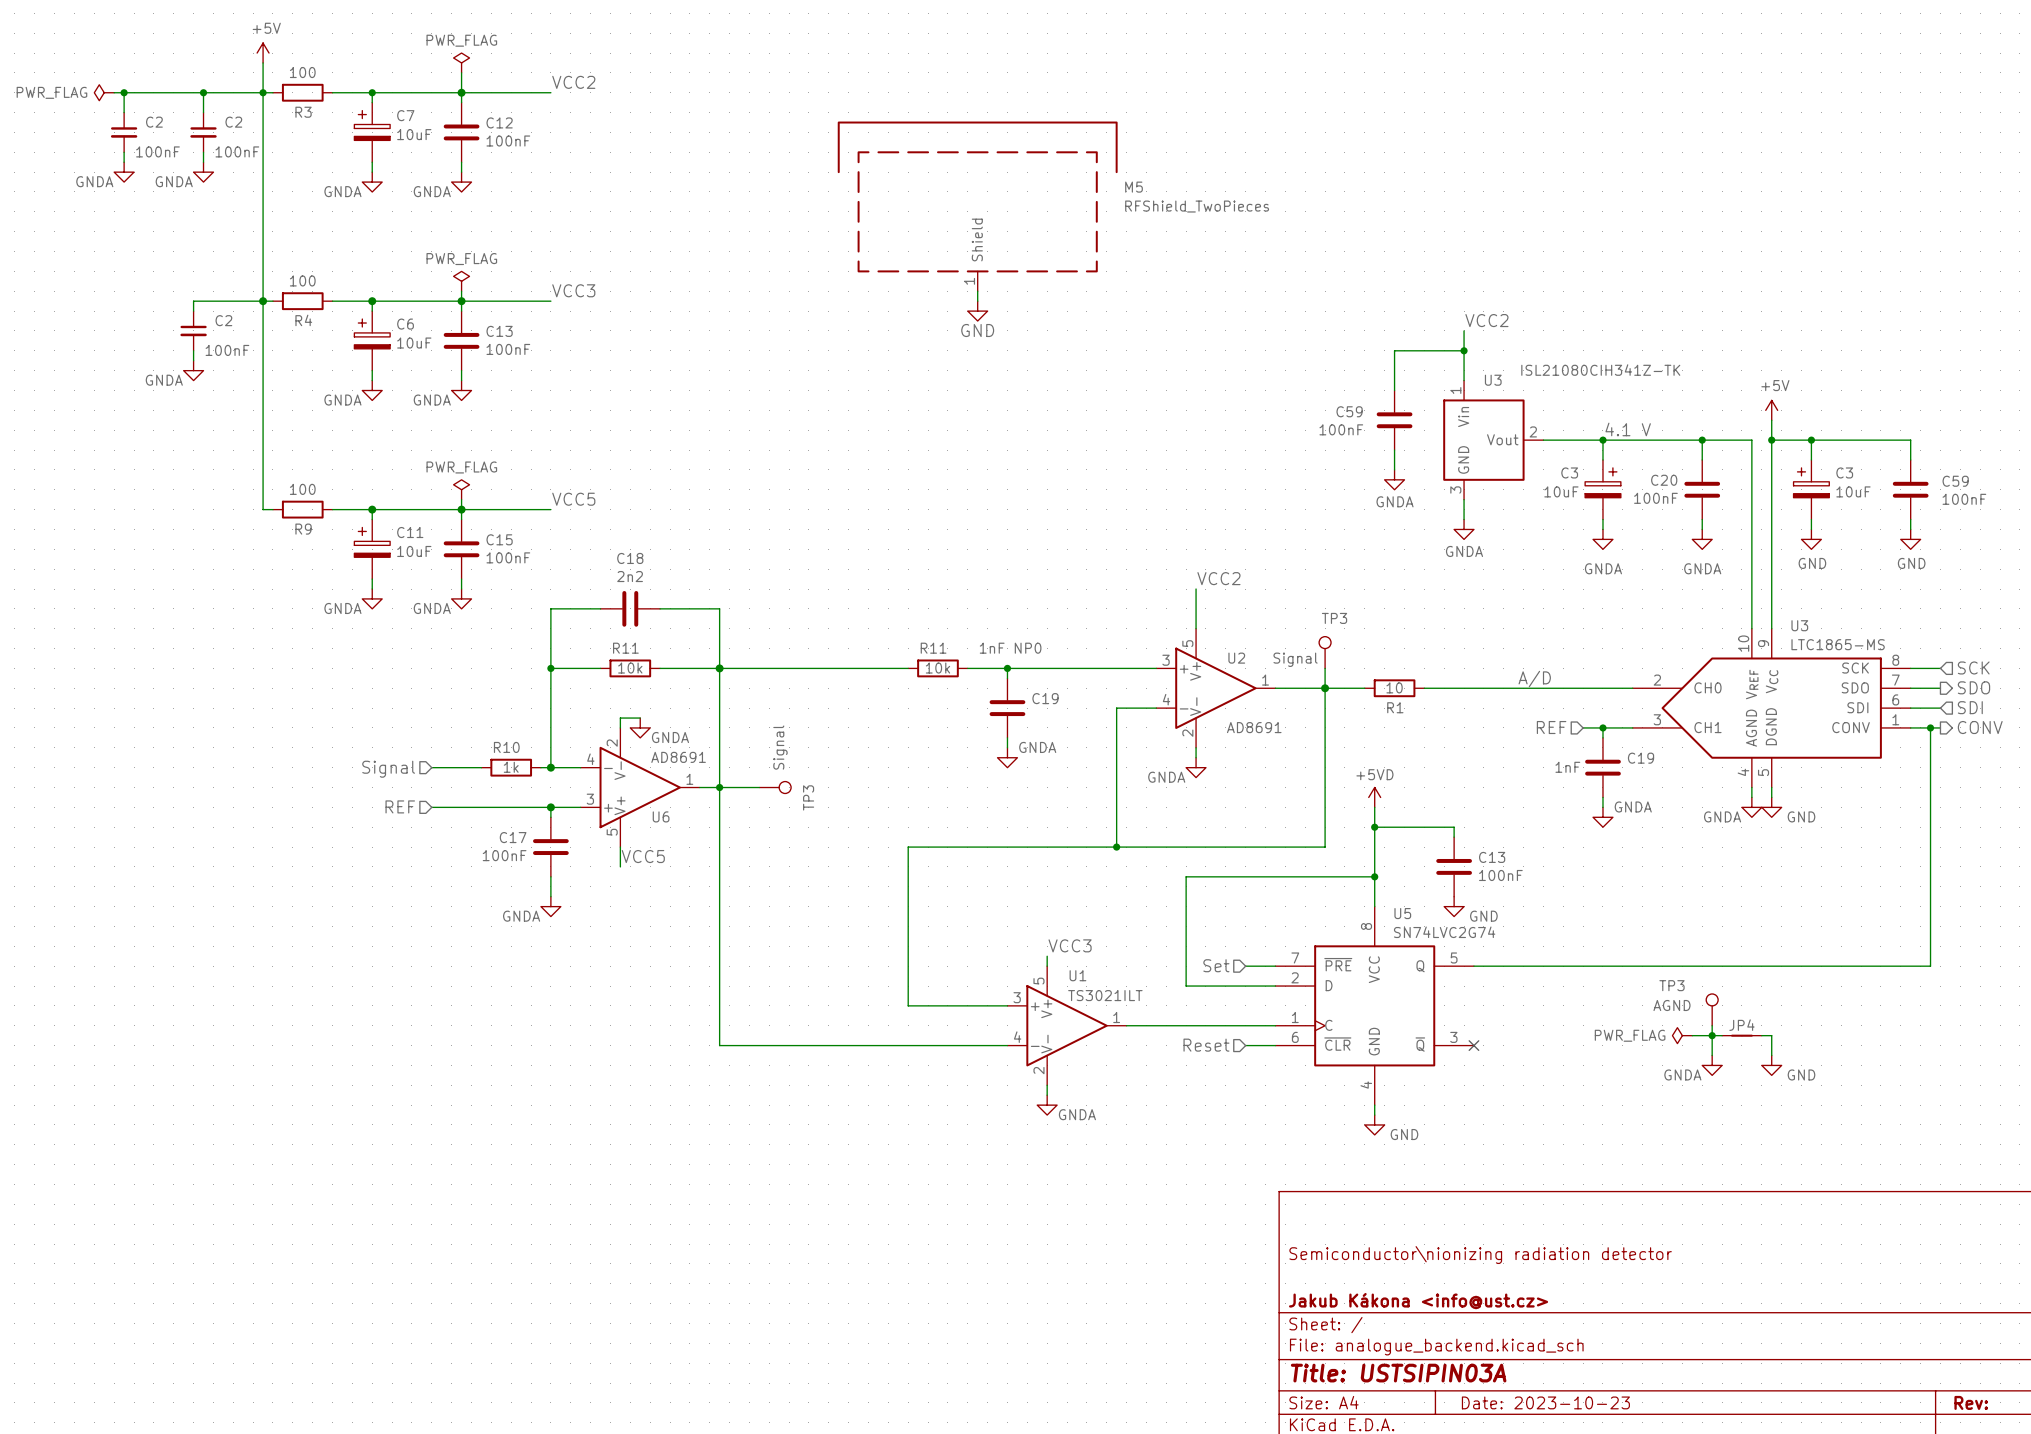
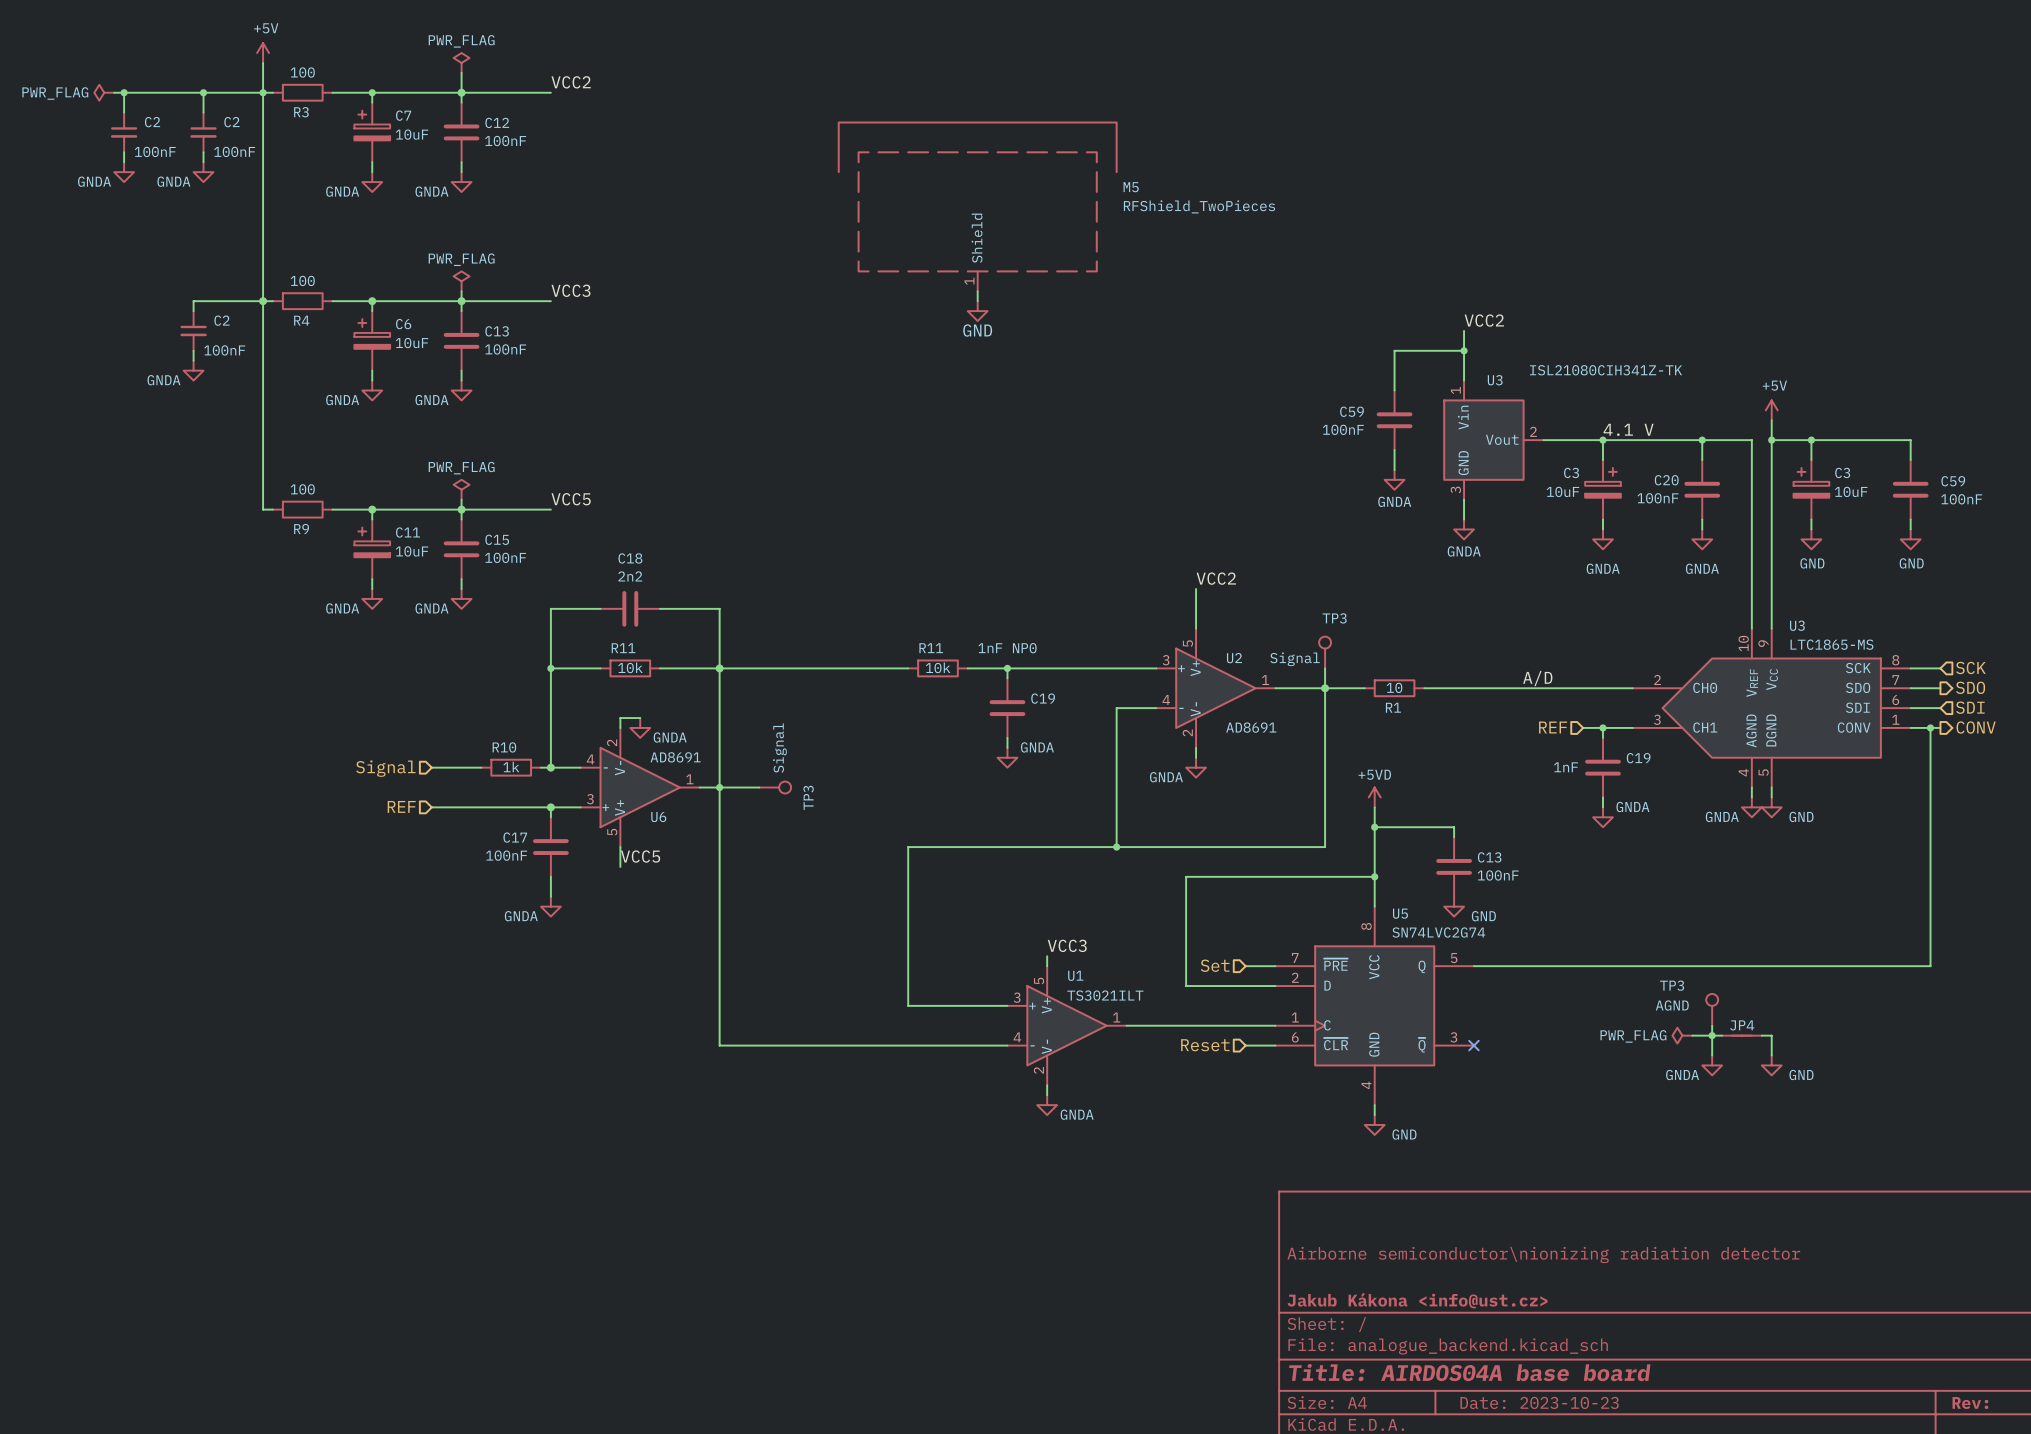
title block: Semiconductor\nionizing radiation detector (1480, 1255) -> Airborne semiconductor\nionizing radiation detector (1543, 1254)
title block: Title: USTSIPIN03A (1398, 1373) -> Title: AIRDOS04A base board (1469, 1372)

